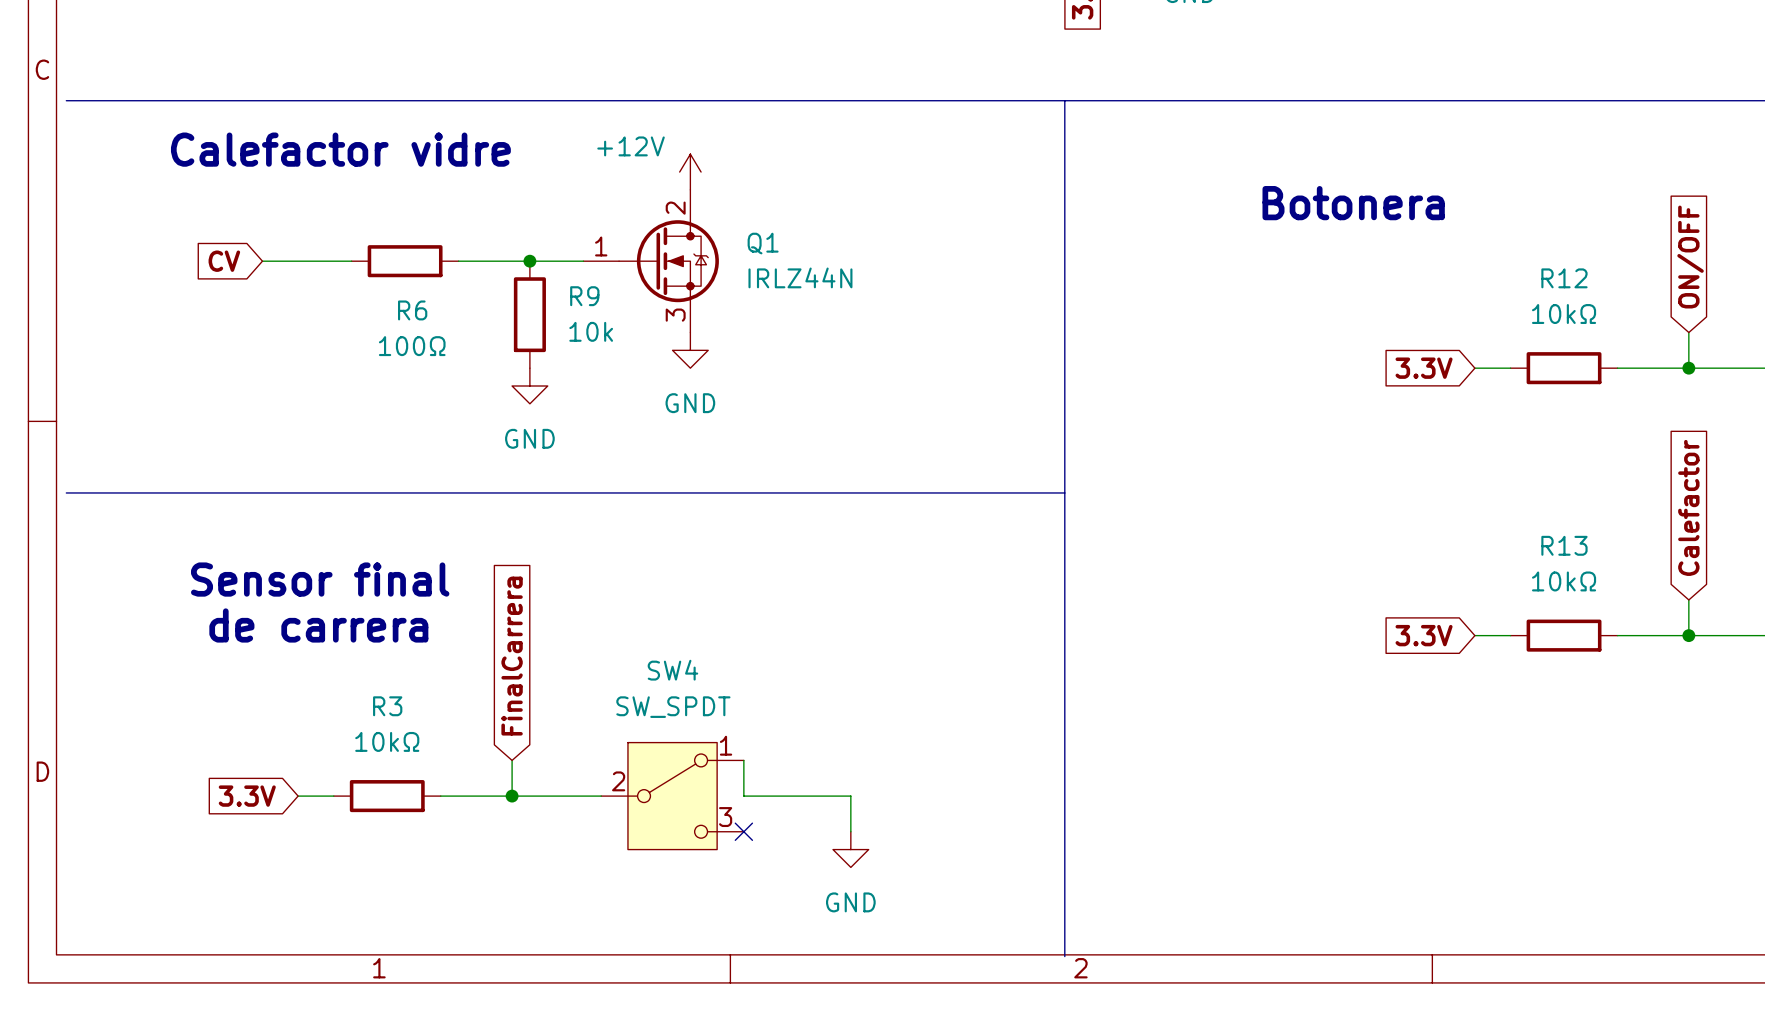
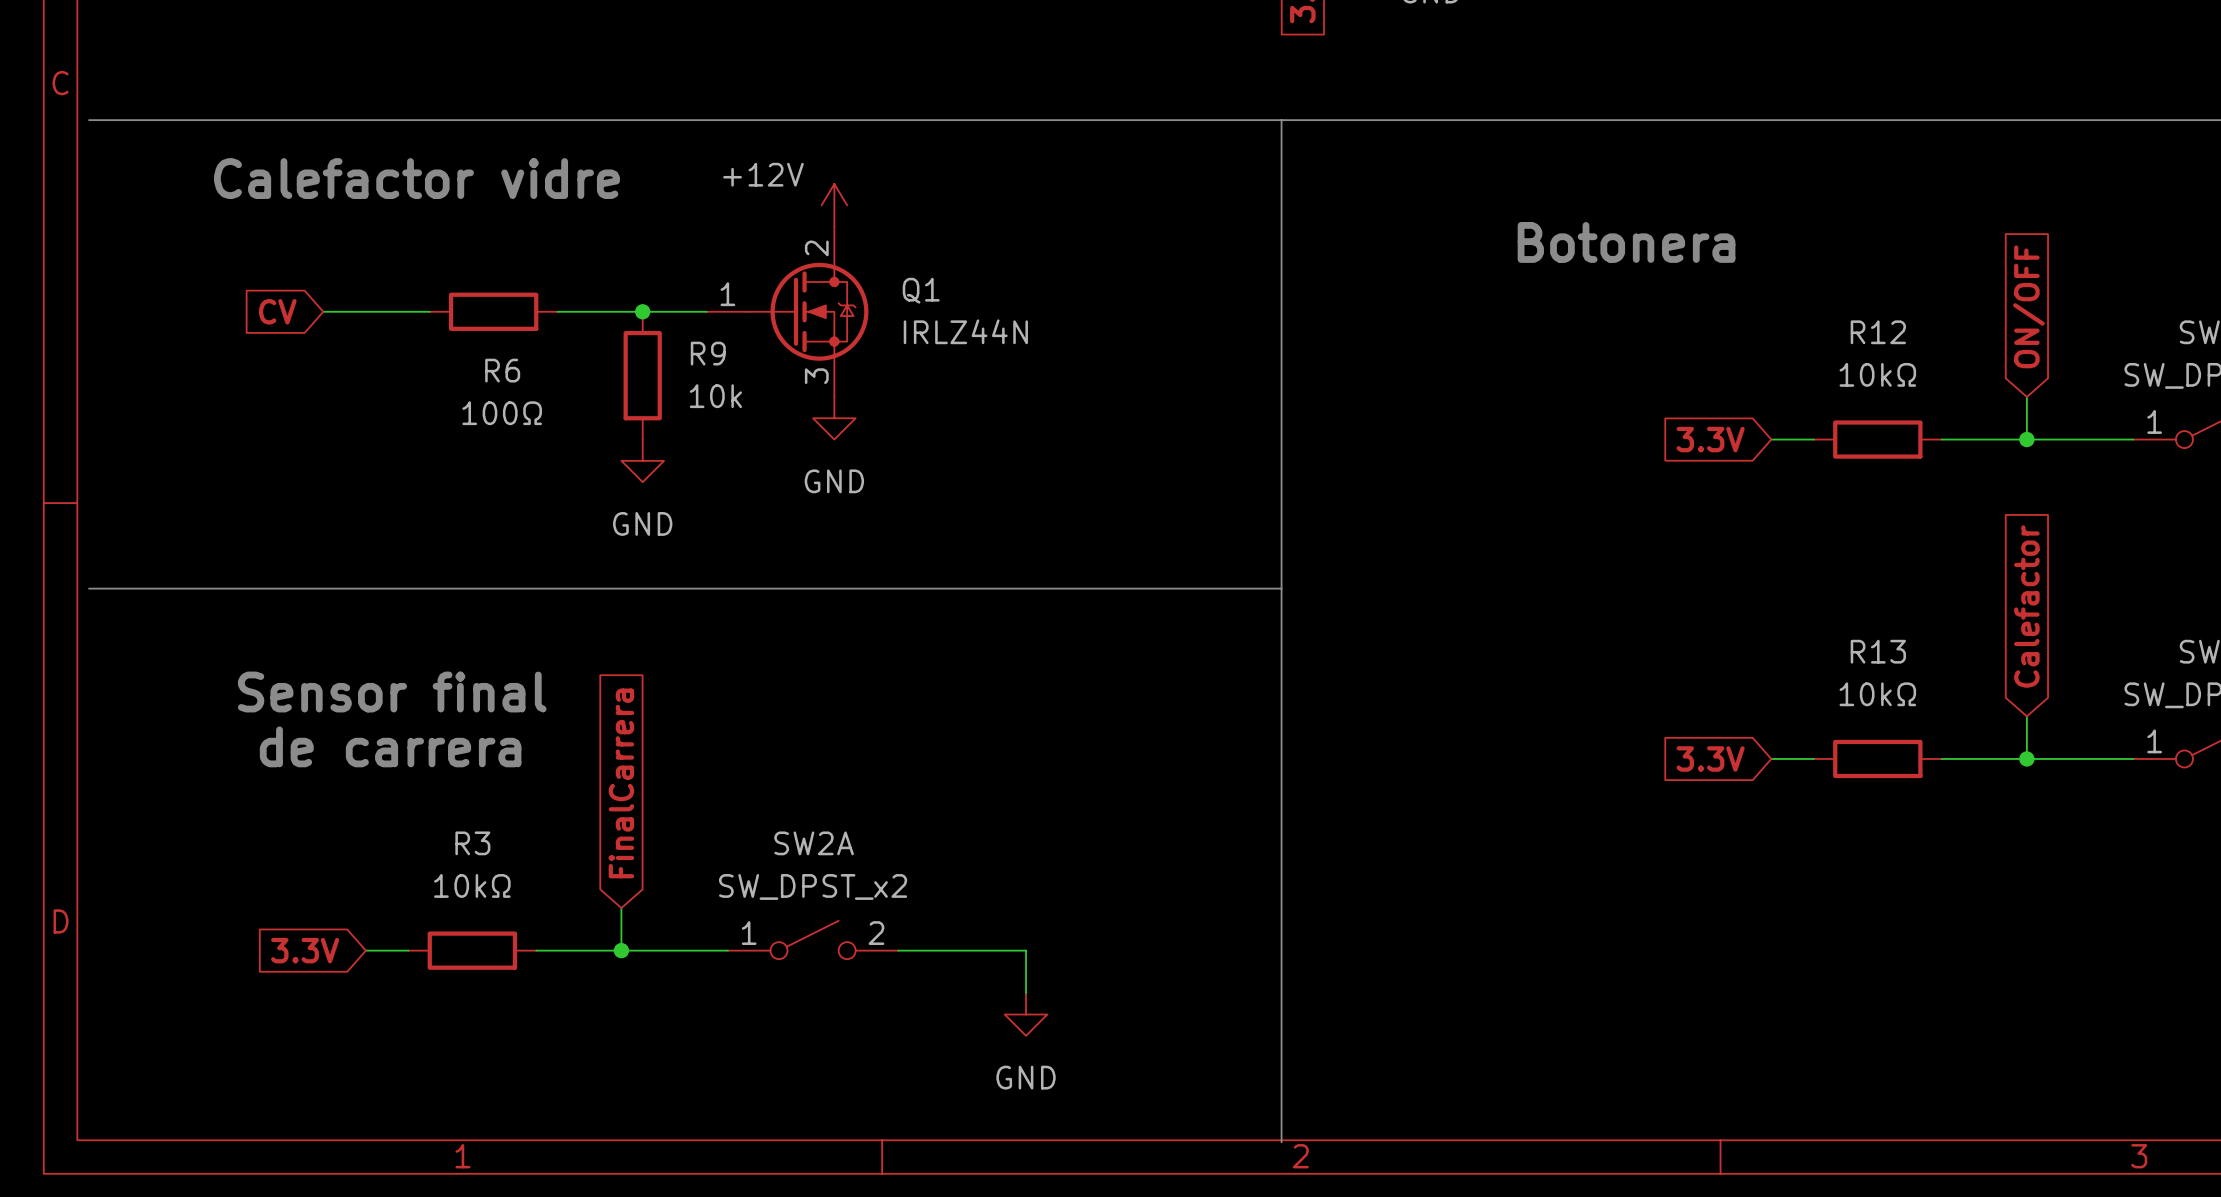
wire: (743, 760) (743, 796) -> none
SW2A: none -> SW_DPST_x2 (813, 939)
SW4: SW_SPDT (672, 796) -> none
no-connect mark: (743, 831) -> none

